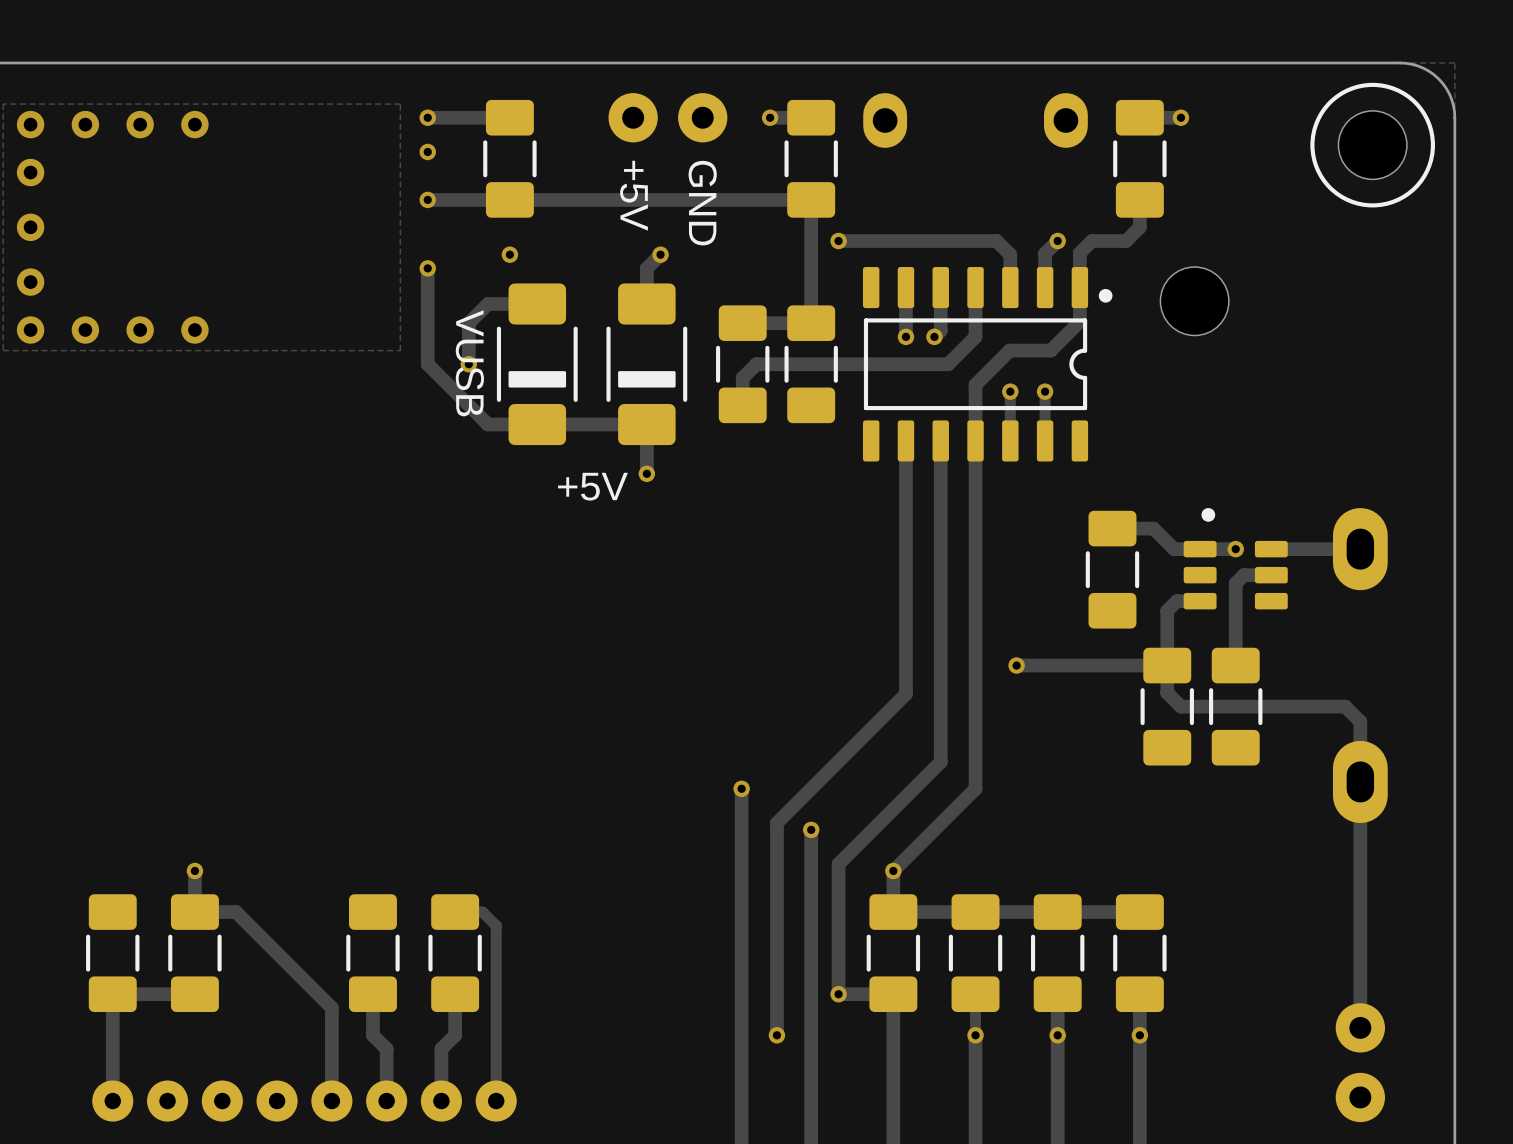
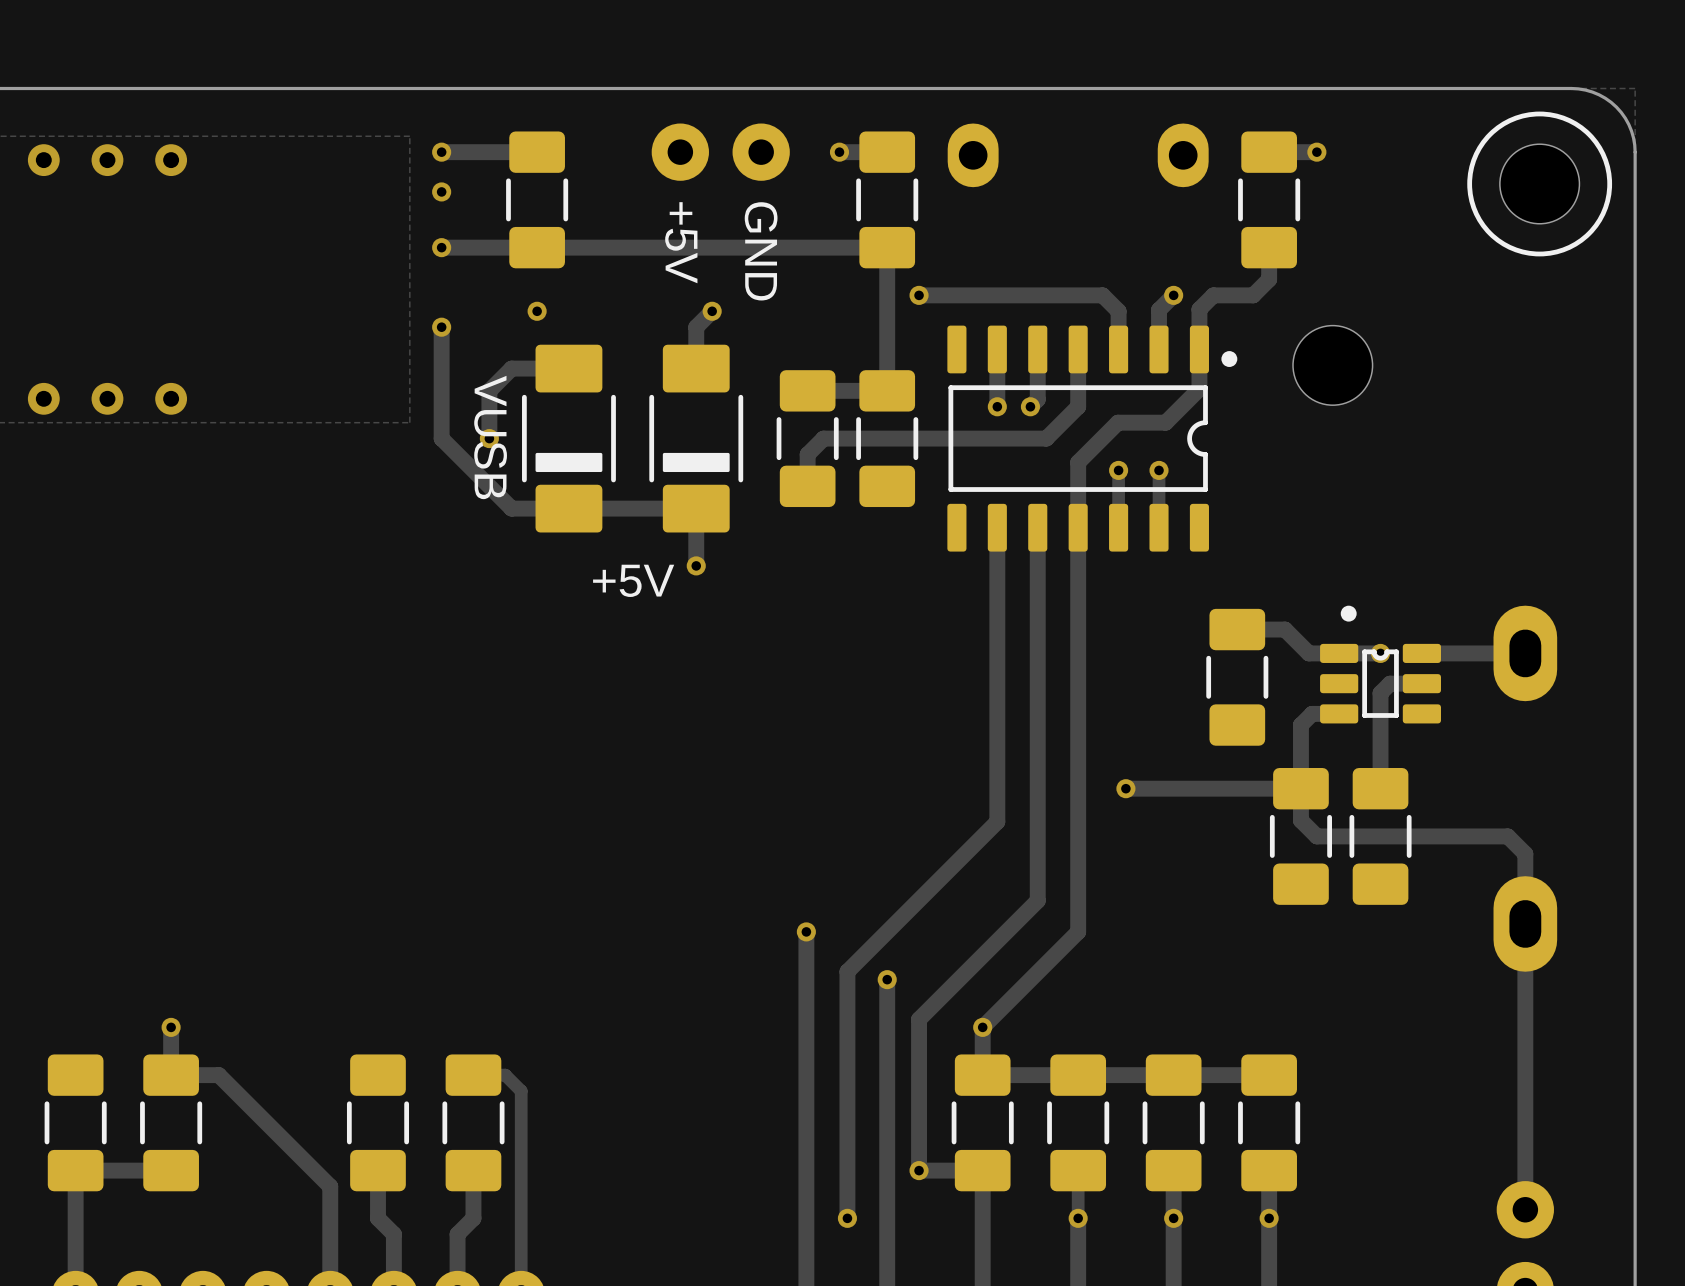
part footprint: [496, 283, 578, 446] -> [522, 344, 616, 533]
part footprint: [606, 283, 688, 446] -> [649, 344, 744, 533]
part footprint: [1183, 540, 1288, 610] -> [1320, 643, 1442, 724]

